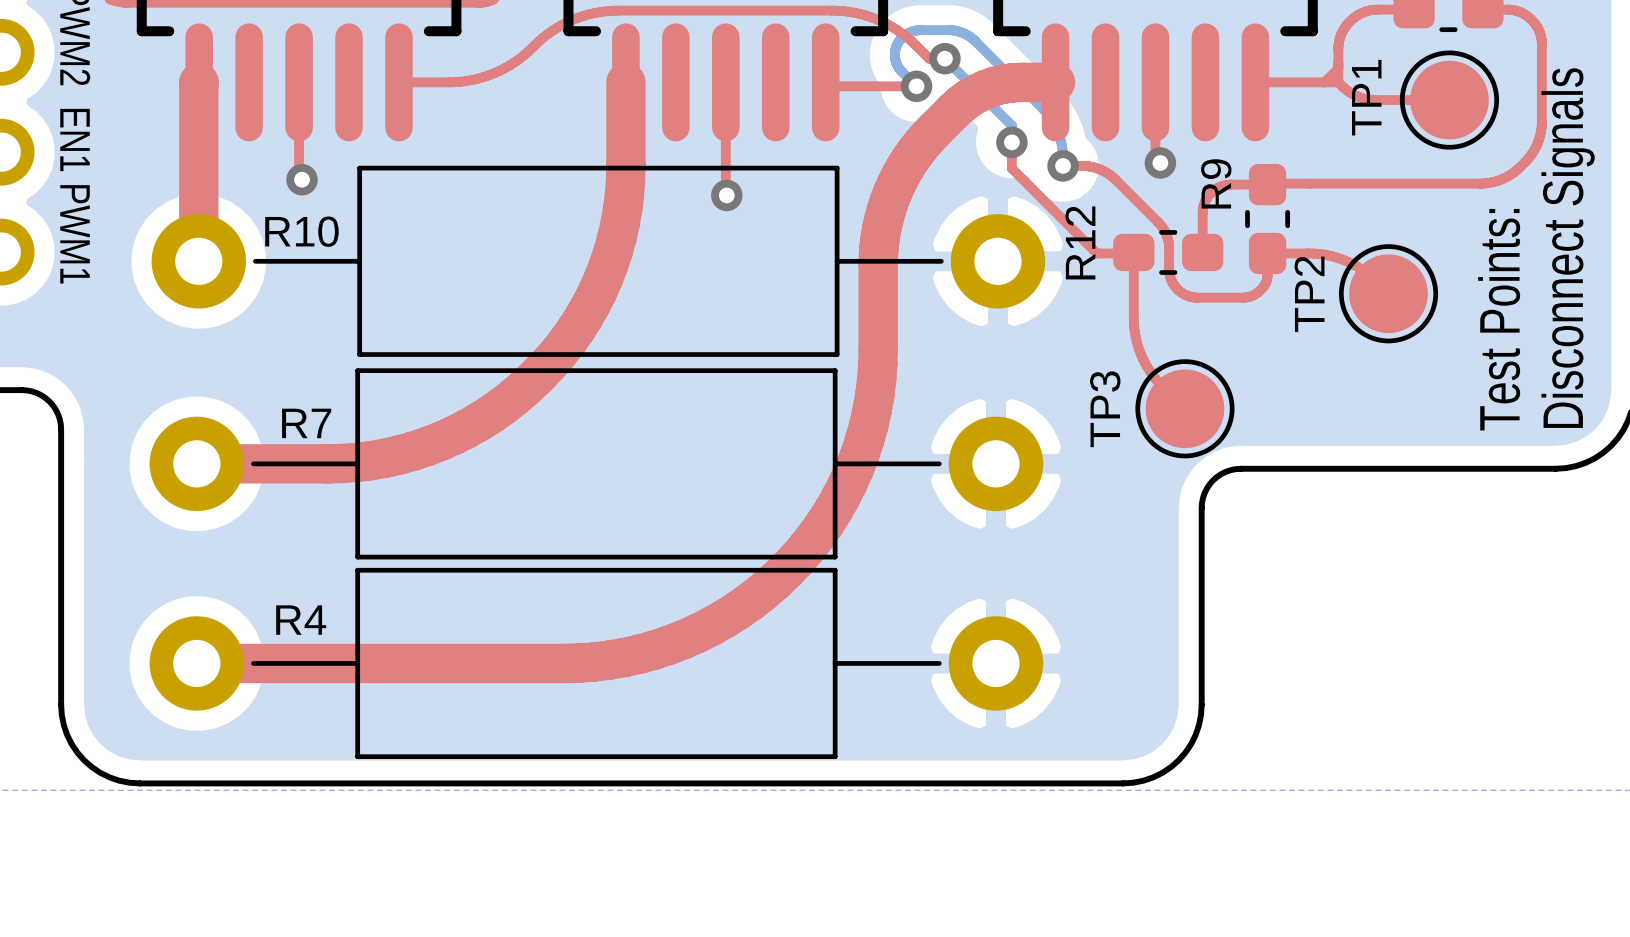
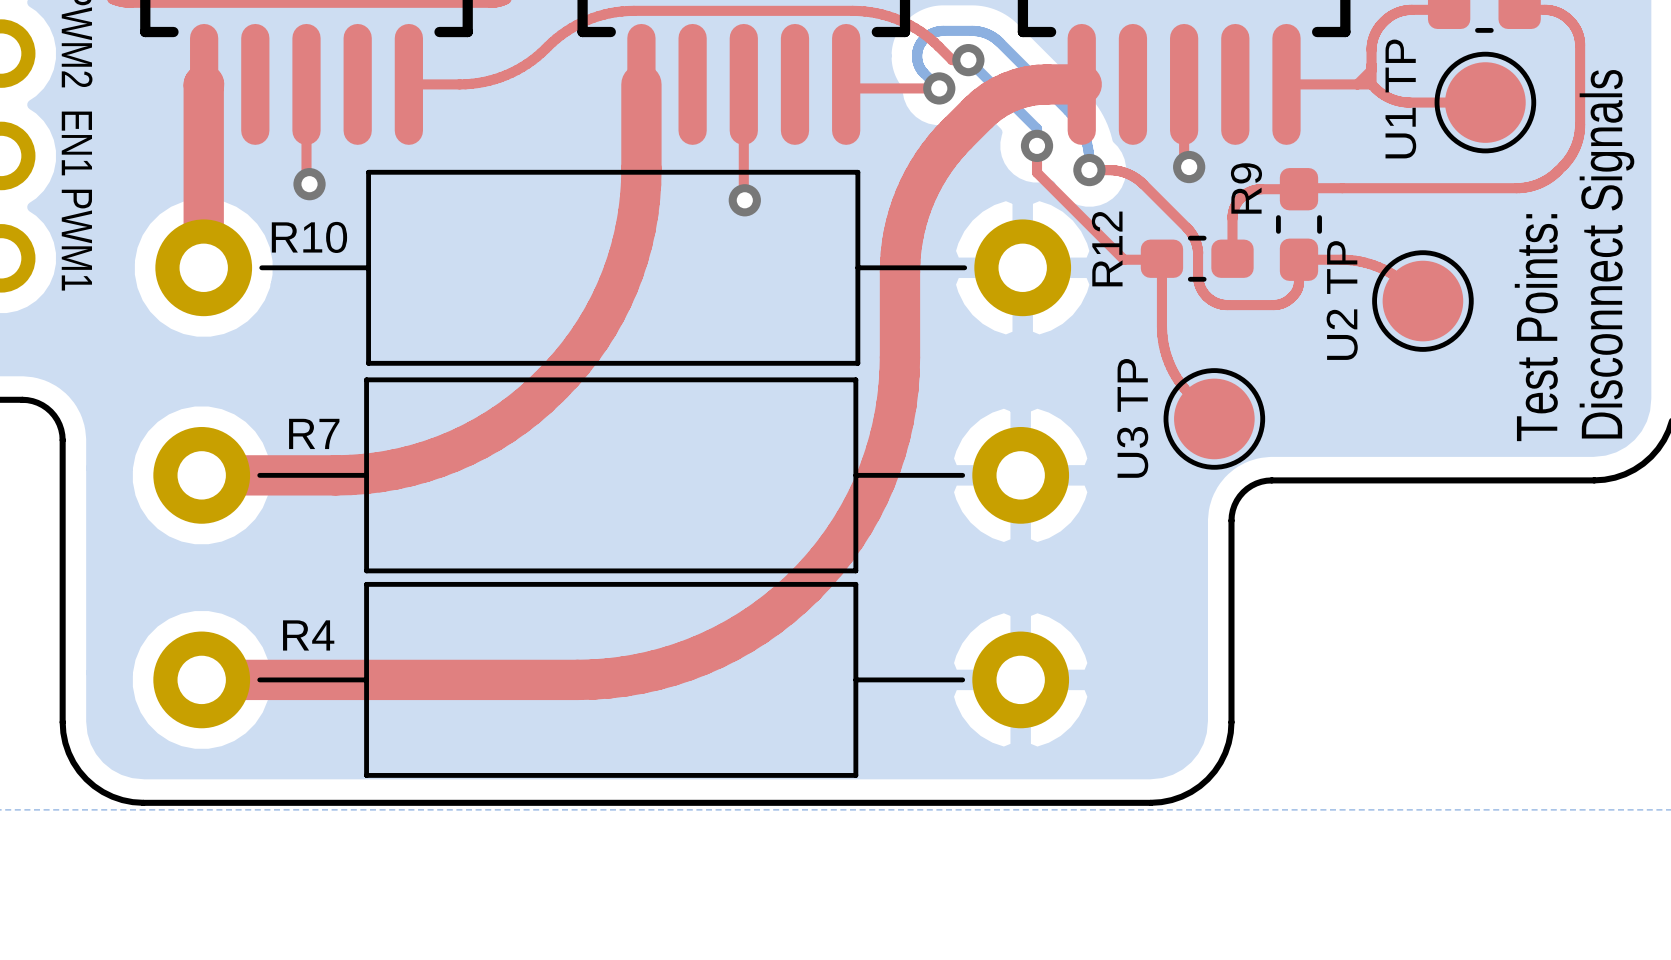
TP1 name: TP1 (1366, 97) -> U1 TP (1400, 98)
TP2 name: TP2 (1309, 294) -> U2 TP (1342, 300)
TP3 name: TP3 (1105, 409) -> U3 TP (1132, 418)

